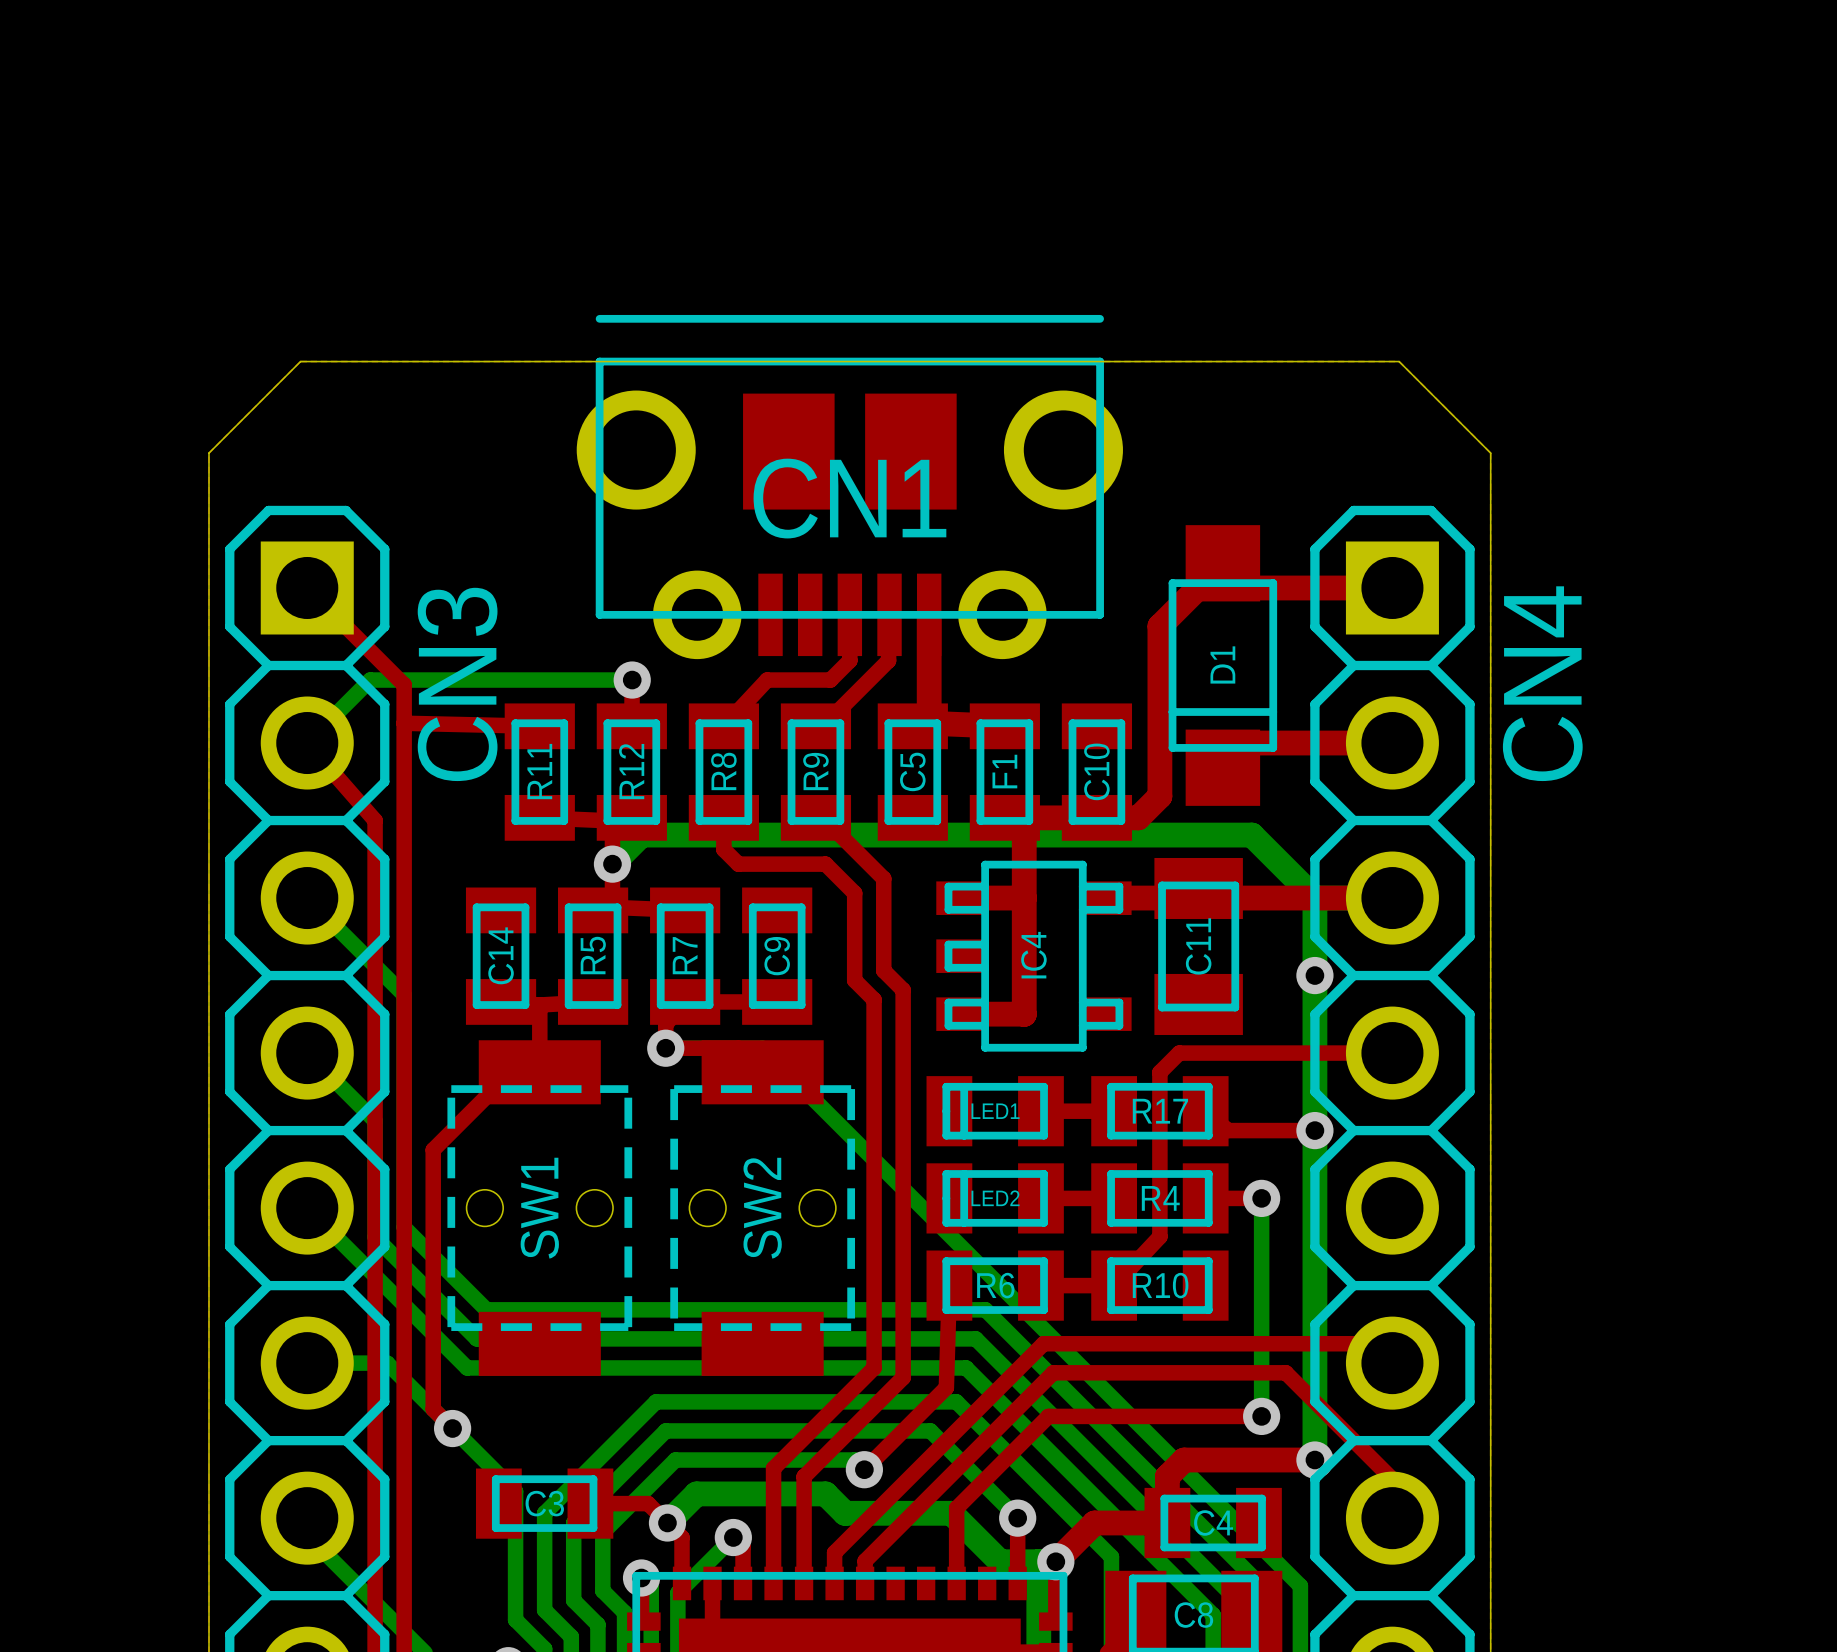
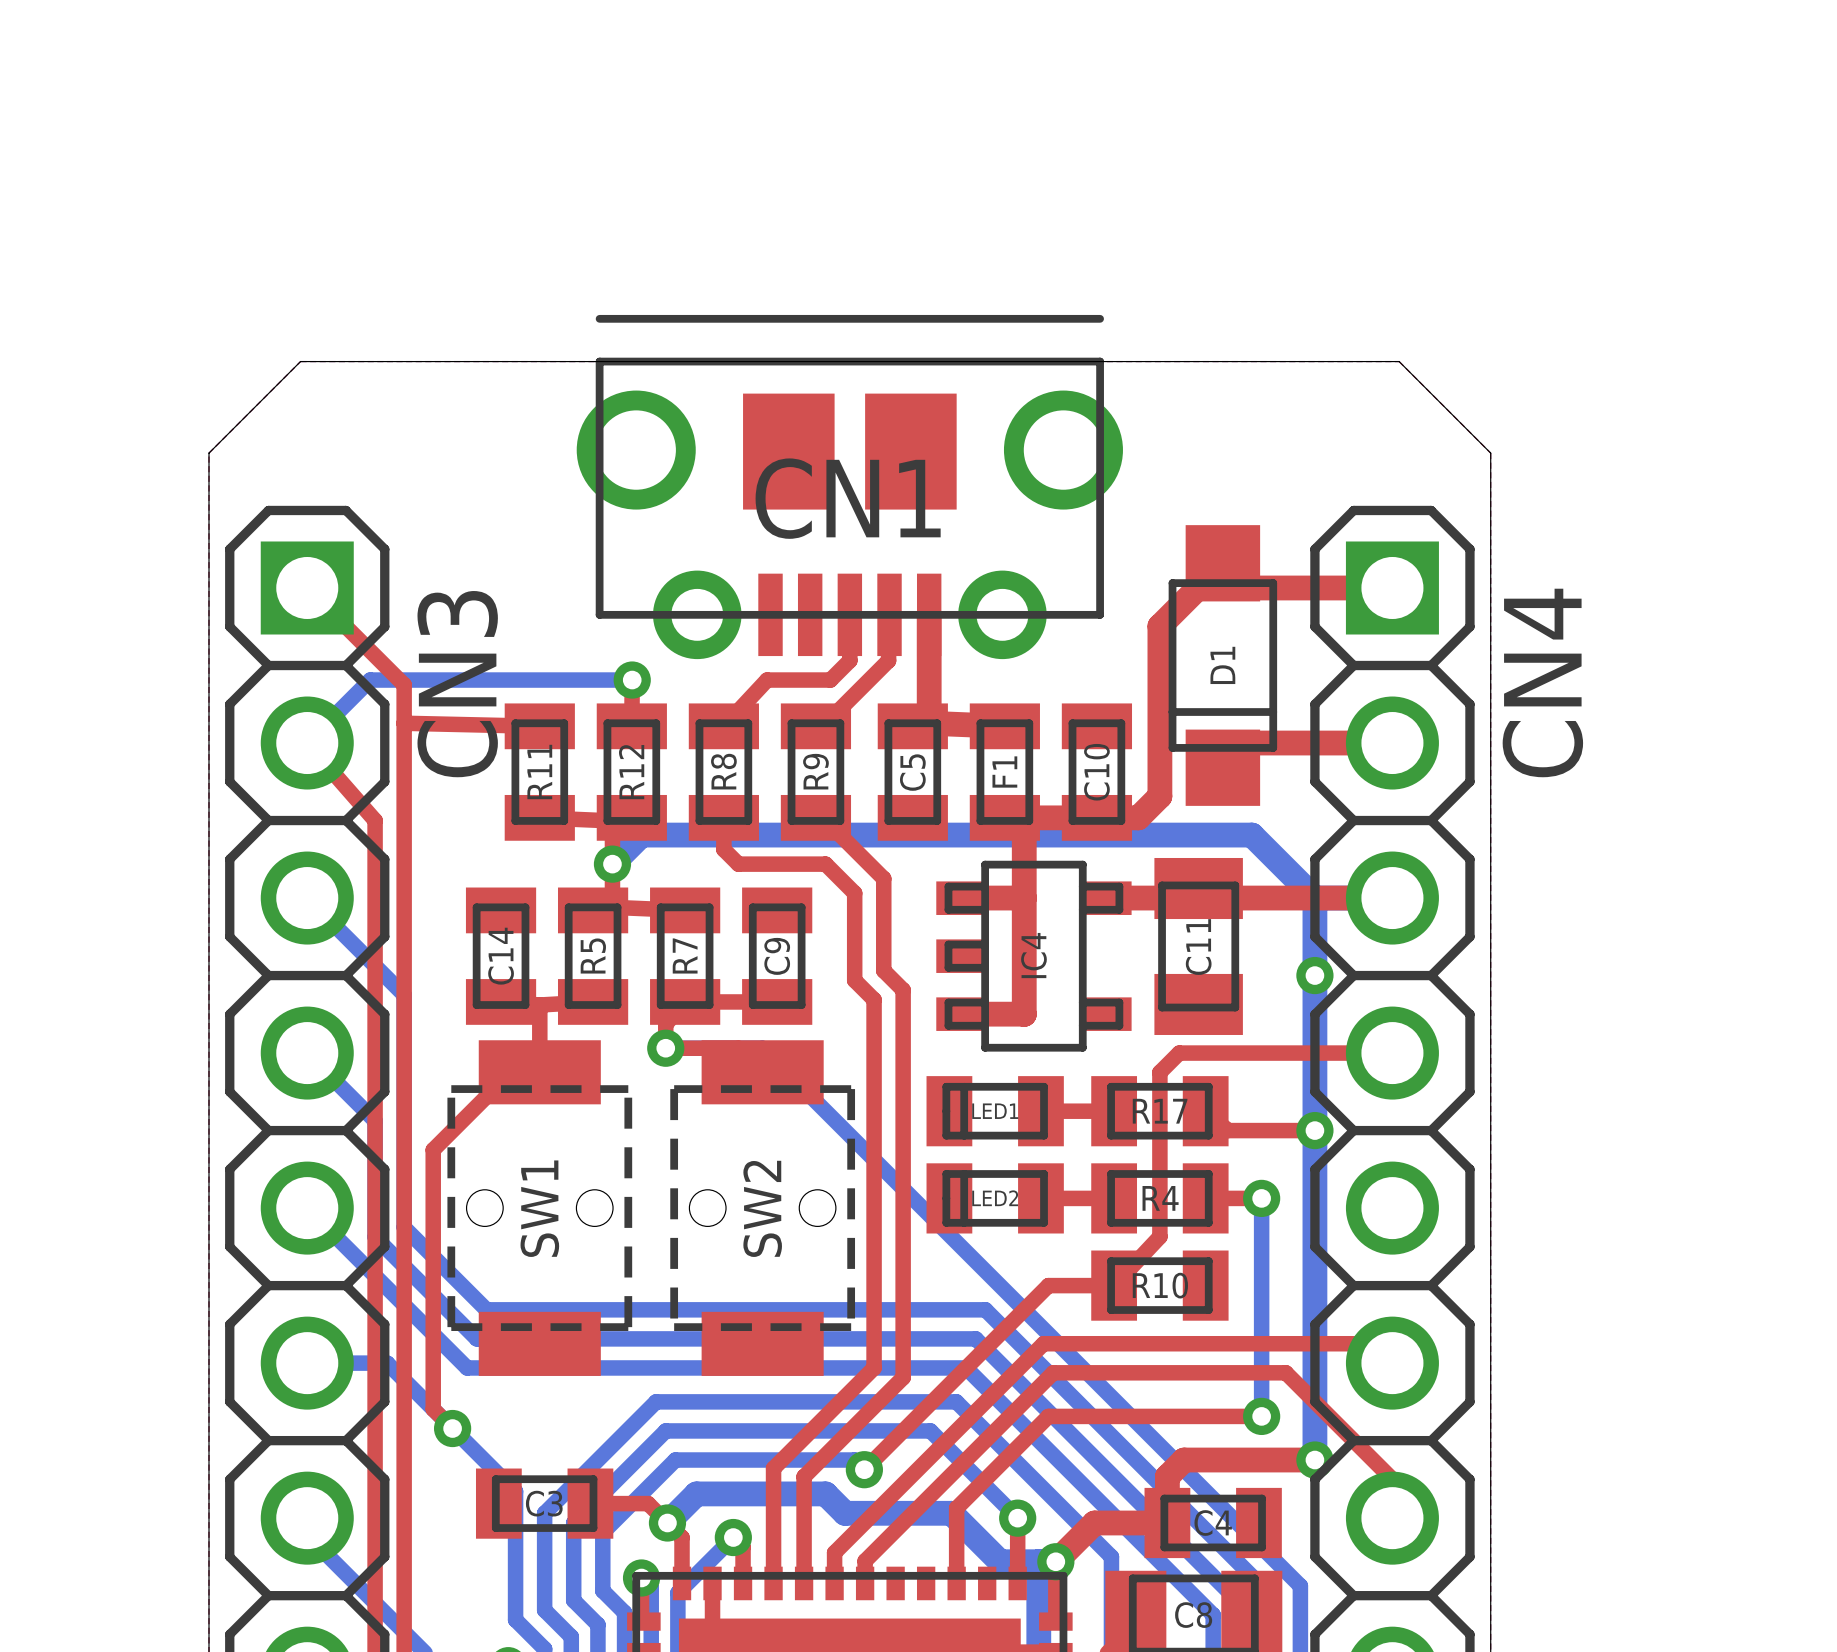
top track: (949, 1285) (946, 1387) -> (1048, 1285) (946, 1387)
R6: (995, 1285) -> none

